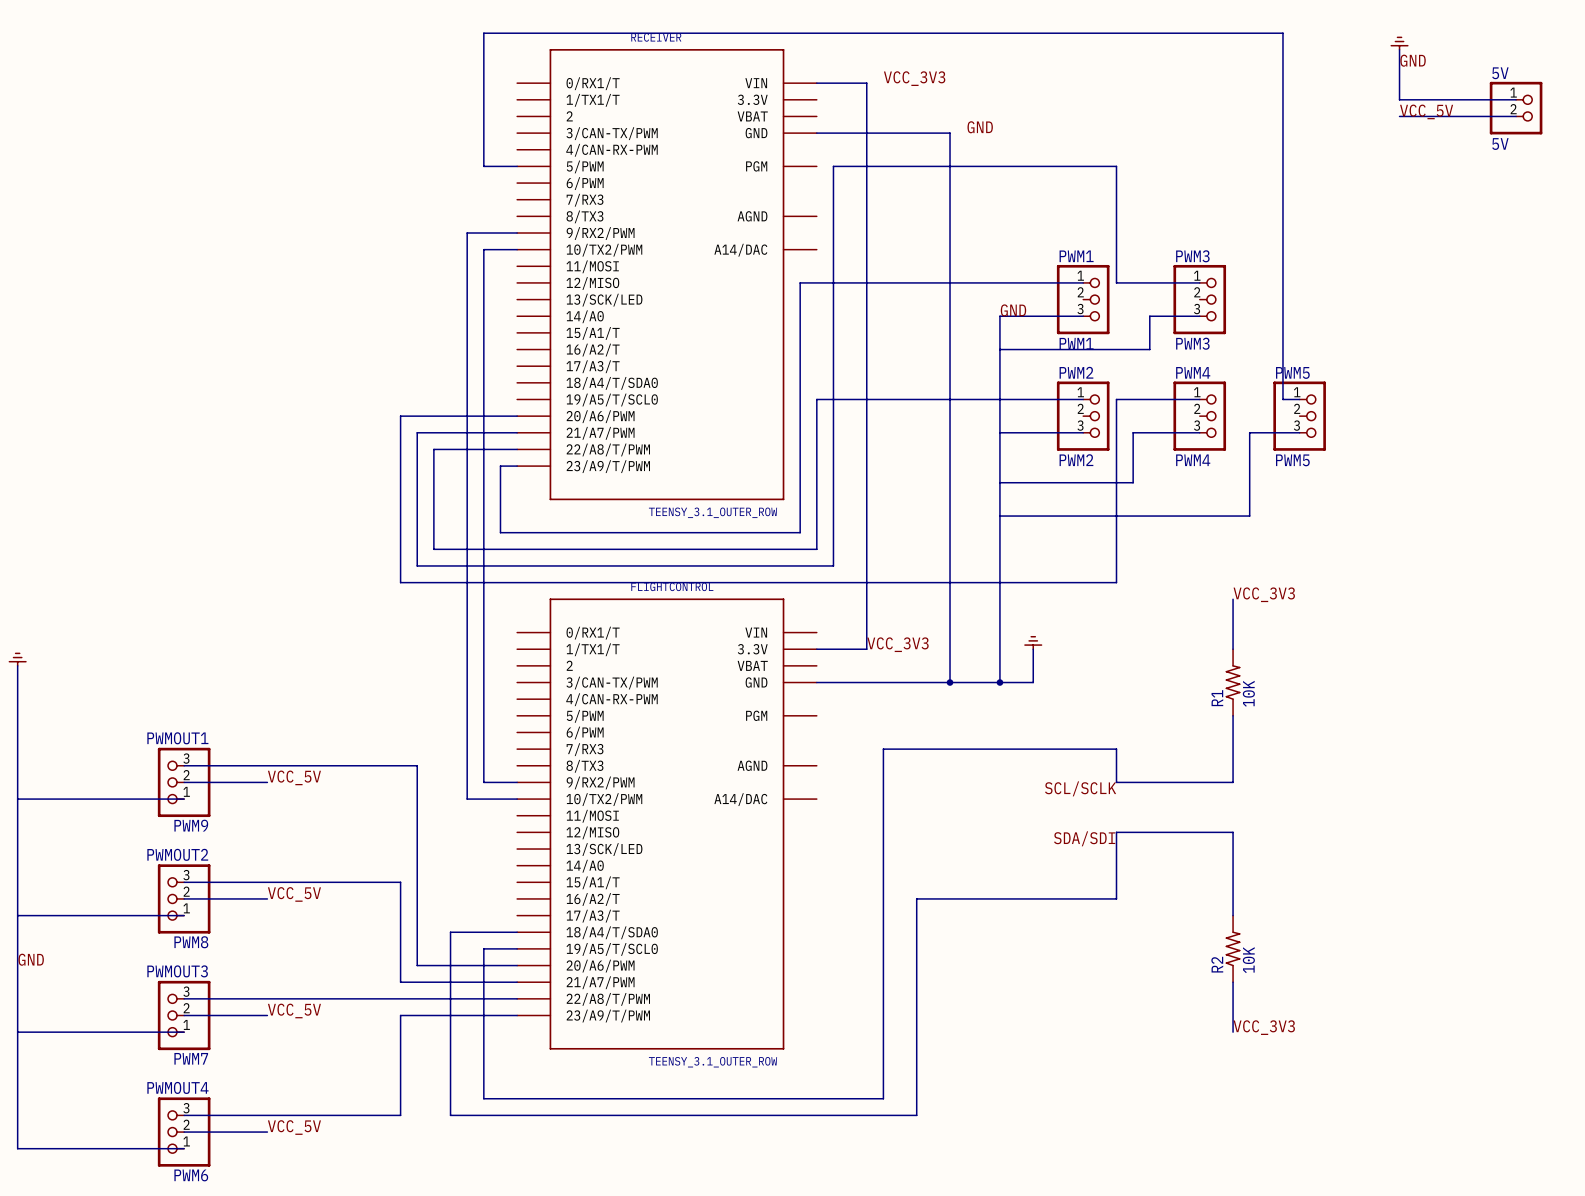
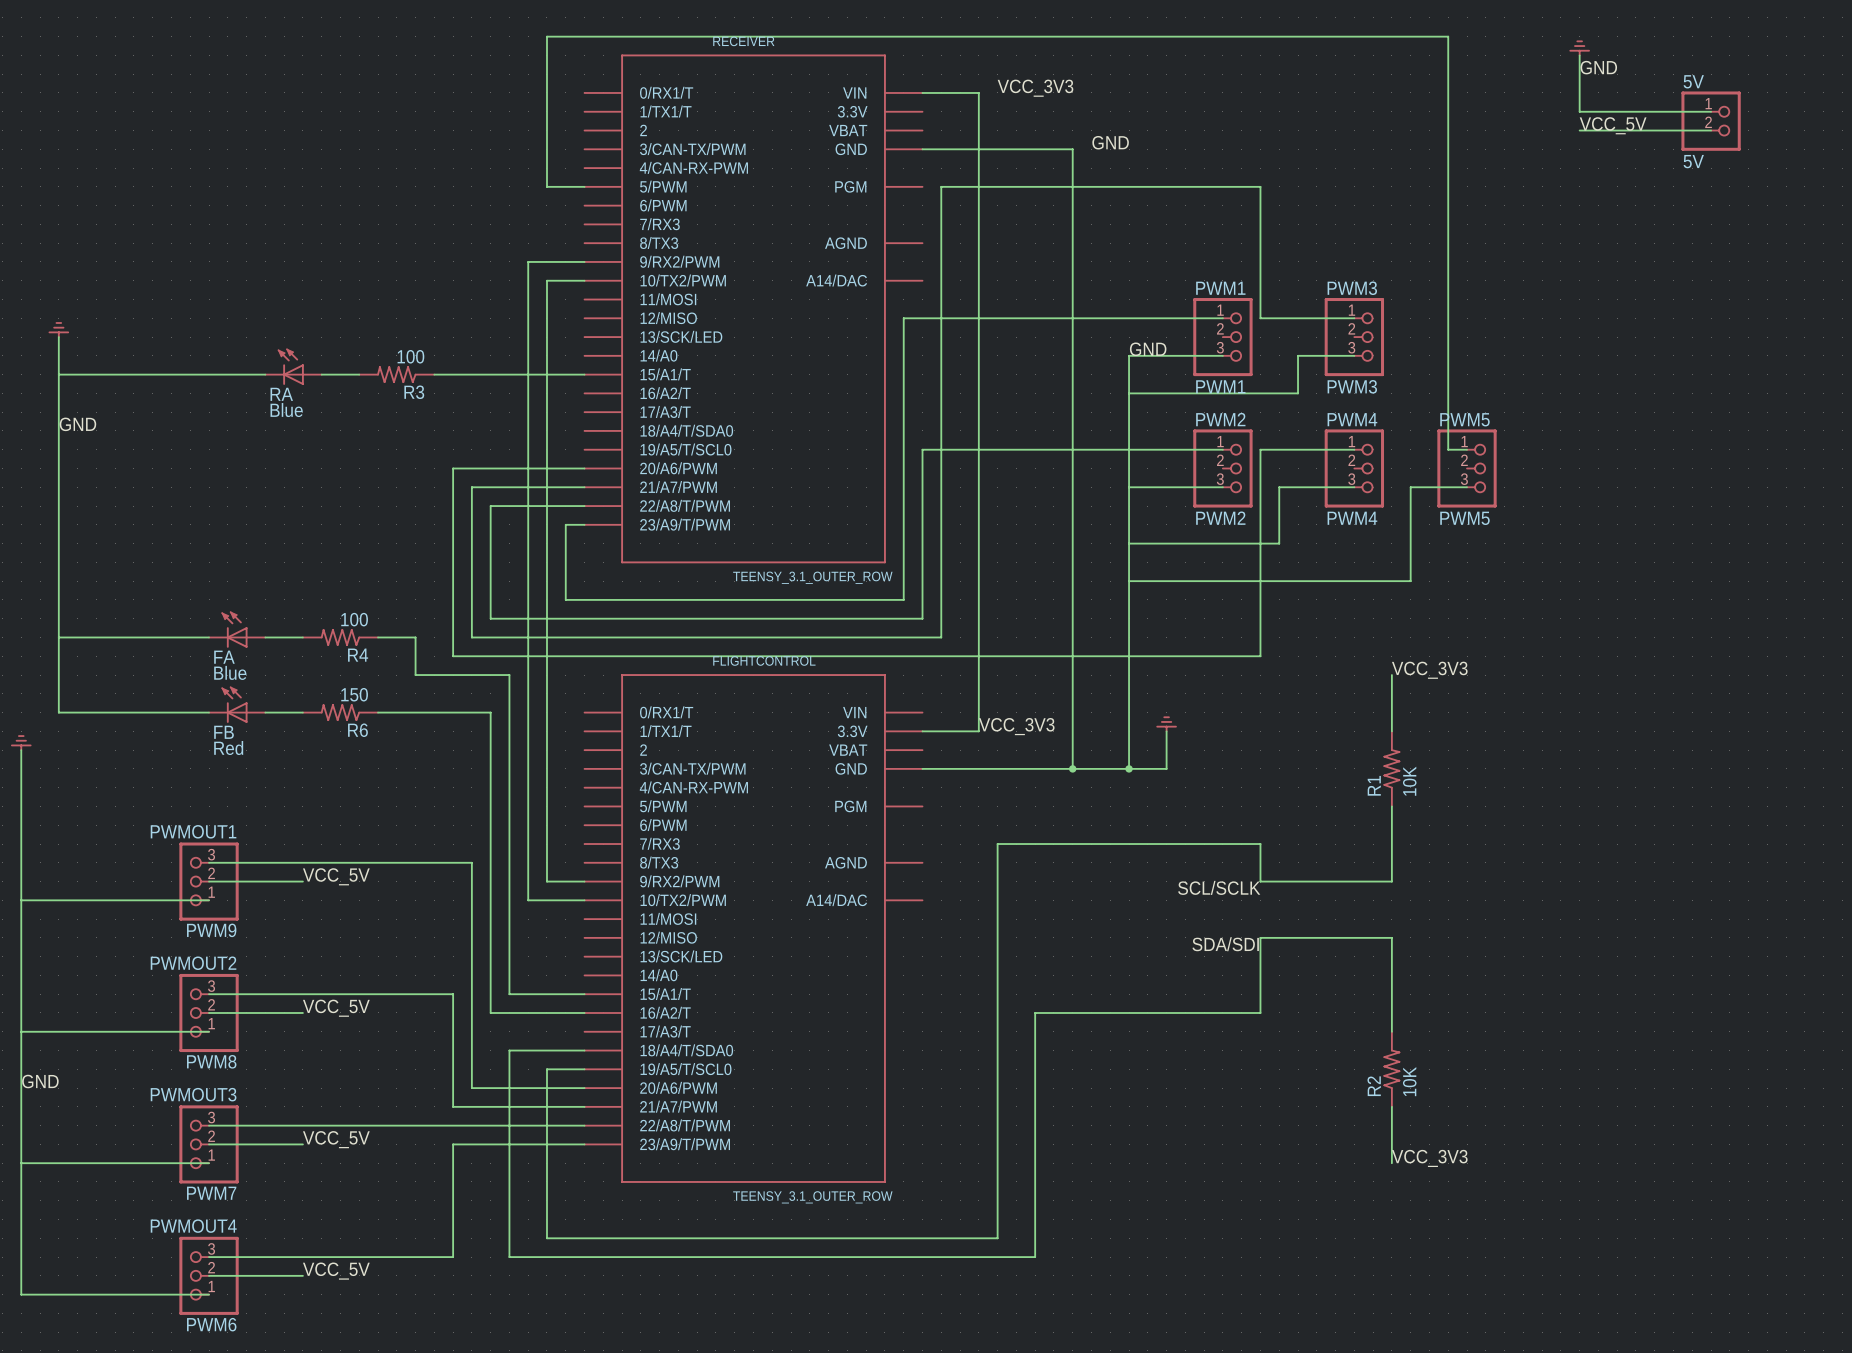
power symbol: none -> (58, 330)
wire: none -> (58, 337) (58, 712) (209, 712)
RA: none -> Blue (293, 366)
wire: none -> (58, 374) (265, 374)
wire: none -> (321, 374) (359, 374)
R3: none -> 100 (396, 374)
wire: none -> (434, 374) (584, 374)
label: none -> GND (77, 424)
FA: none -> Blue (237, 629)
wire: none -> (58, 637) (209, 637)
wire: none -> (265, 637) (302, 637)
R4: none -> 100 (340, 637)
wire: none -> (378, 637) (415, 637) (415, 675) (509, 675) (509, 994) (584, 994)
FB: none -> Red (237, 704)
wire: none -> (265, 712) (302, 712)
R6: none -> 150 (340, 712)
wire: none -> (378, 712) (490, 712) (490, 1012) (584, 1012)

